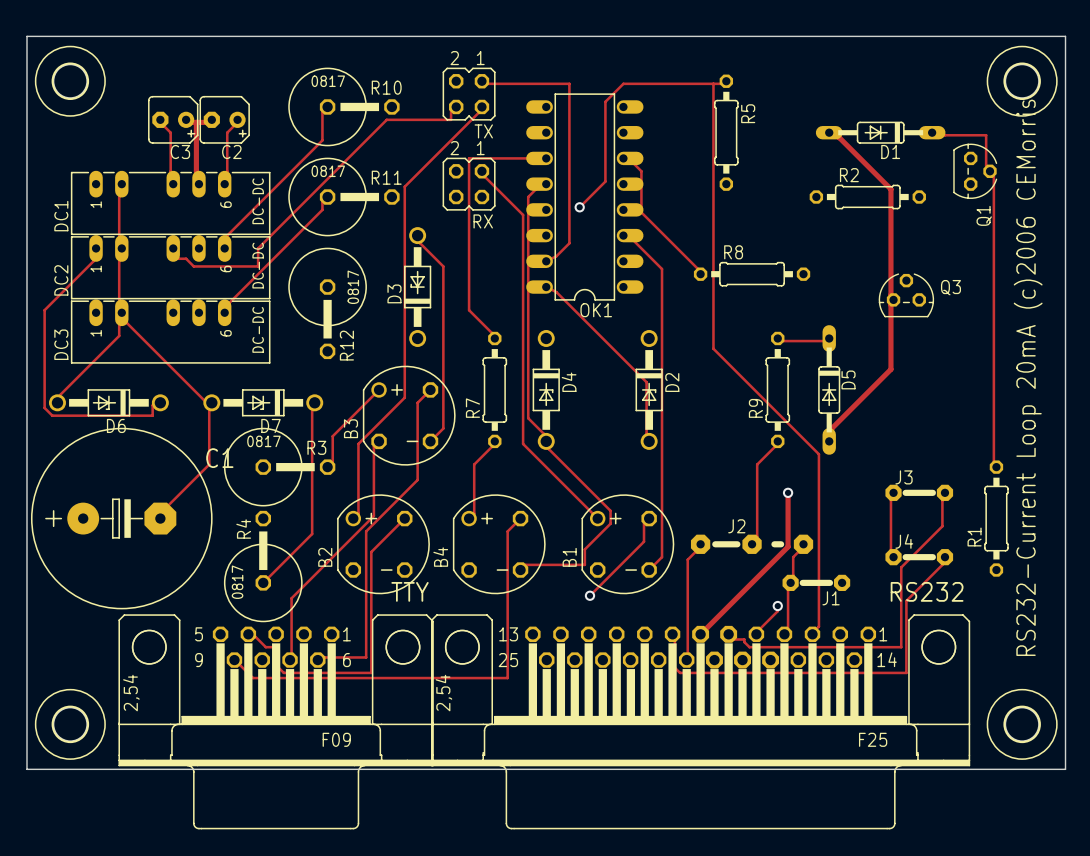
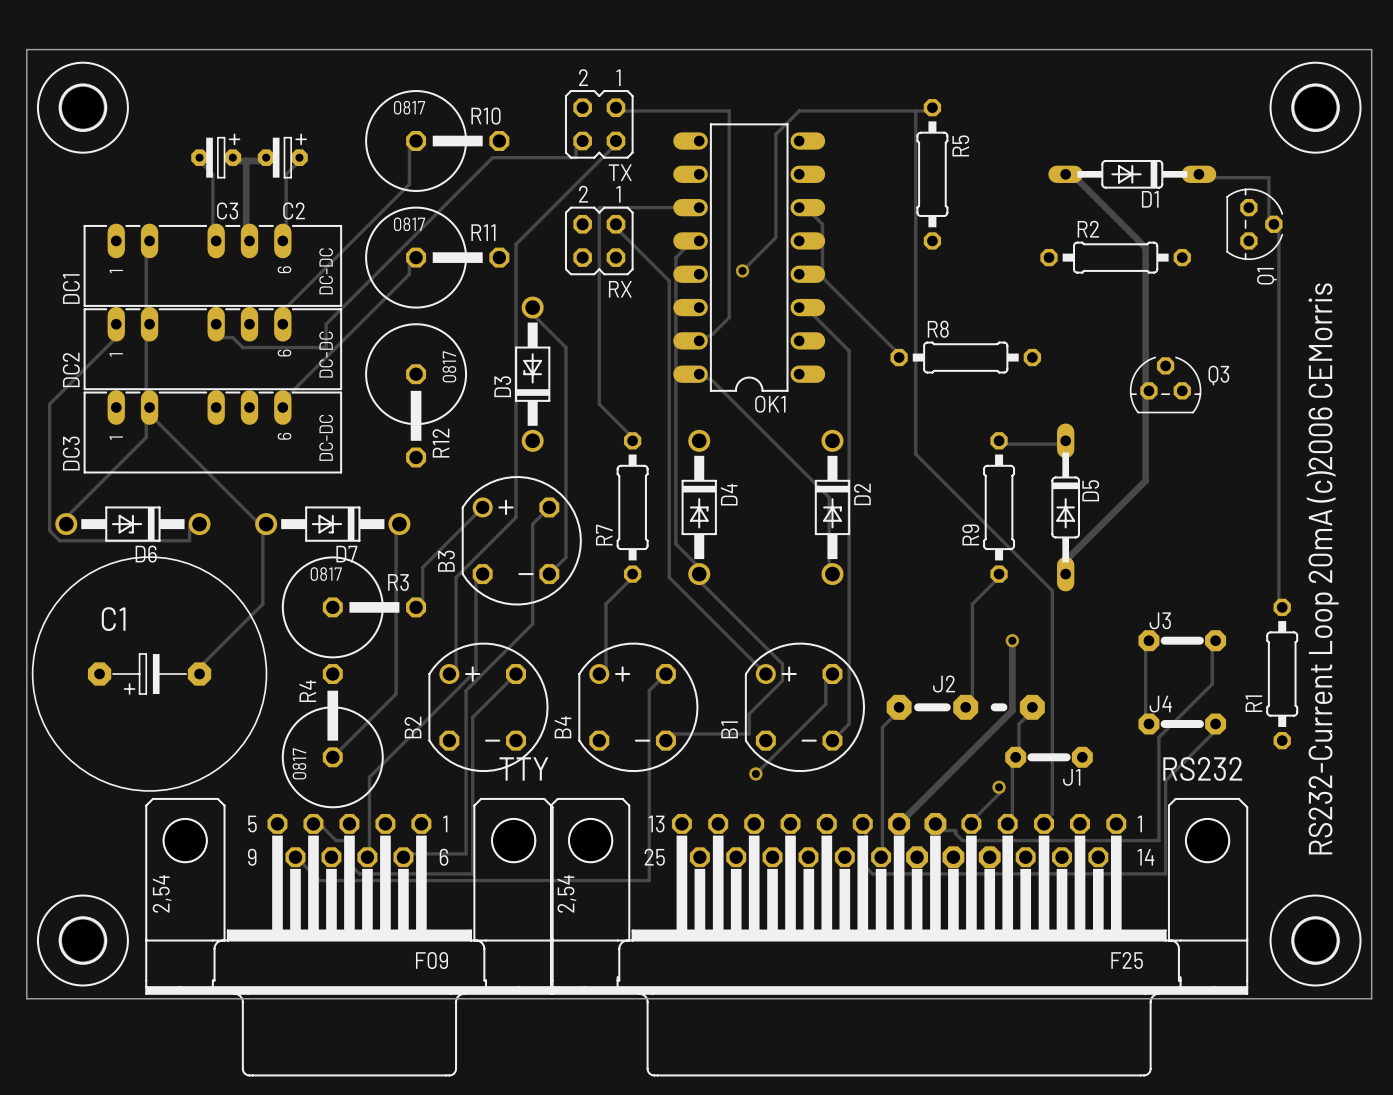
C3 footprint: [148, 95, 199, 144] -> [191, 133, 242, 179]
C2 footprint: [199, 95, 250, 144] -> [257, 133, 308, 179]
C1 footprint: [30, 427, 213, 610] -> [31, 556, 268, 792]
C1 name position: C1 (219, 458) -> C1 (113, 619)

